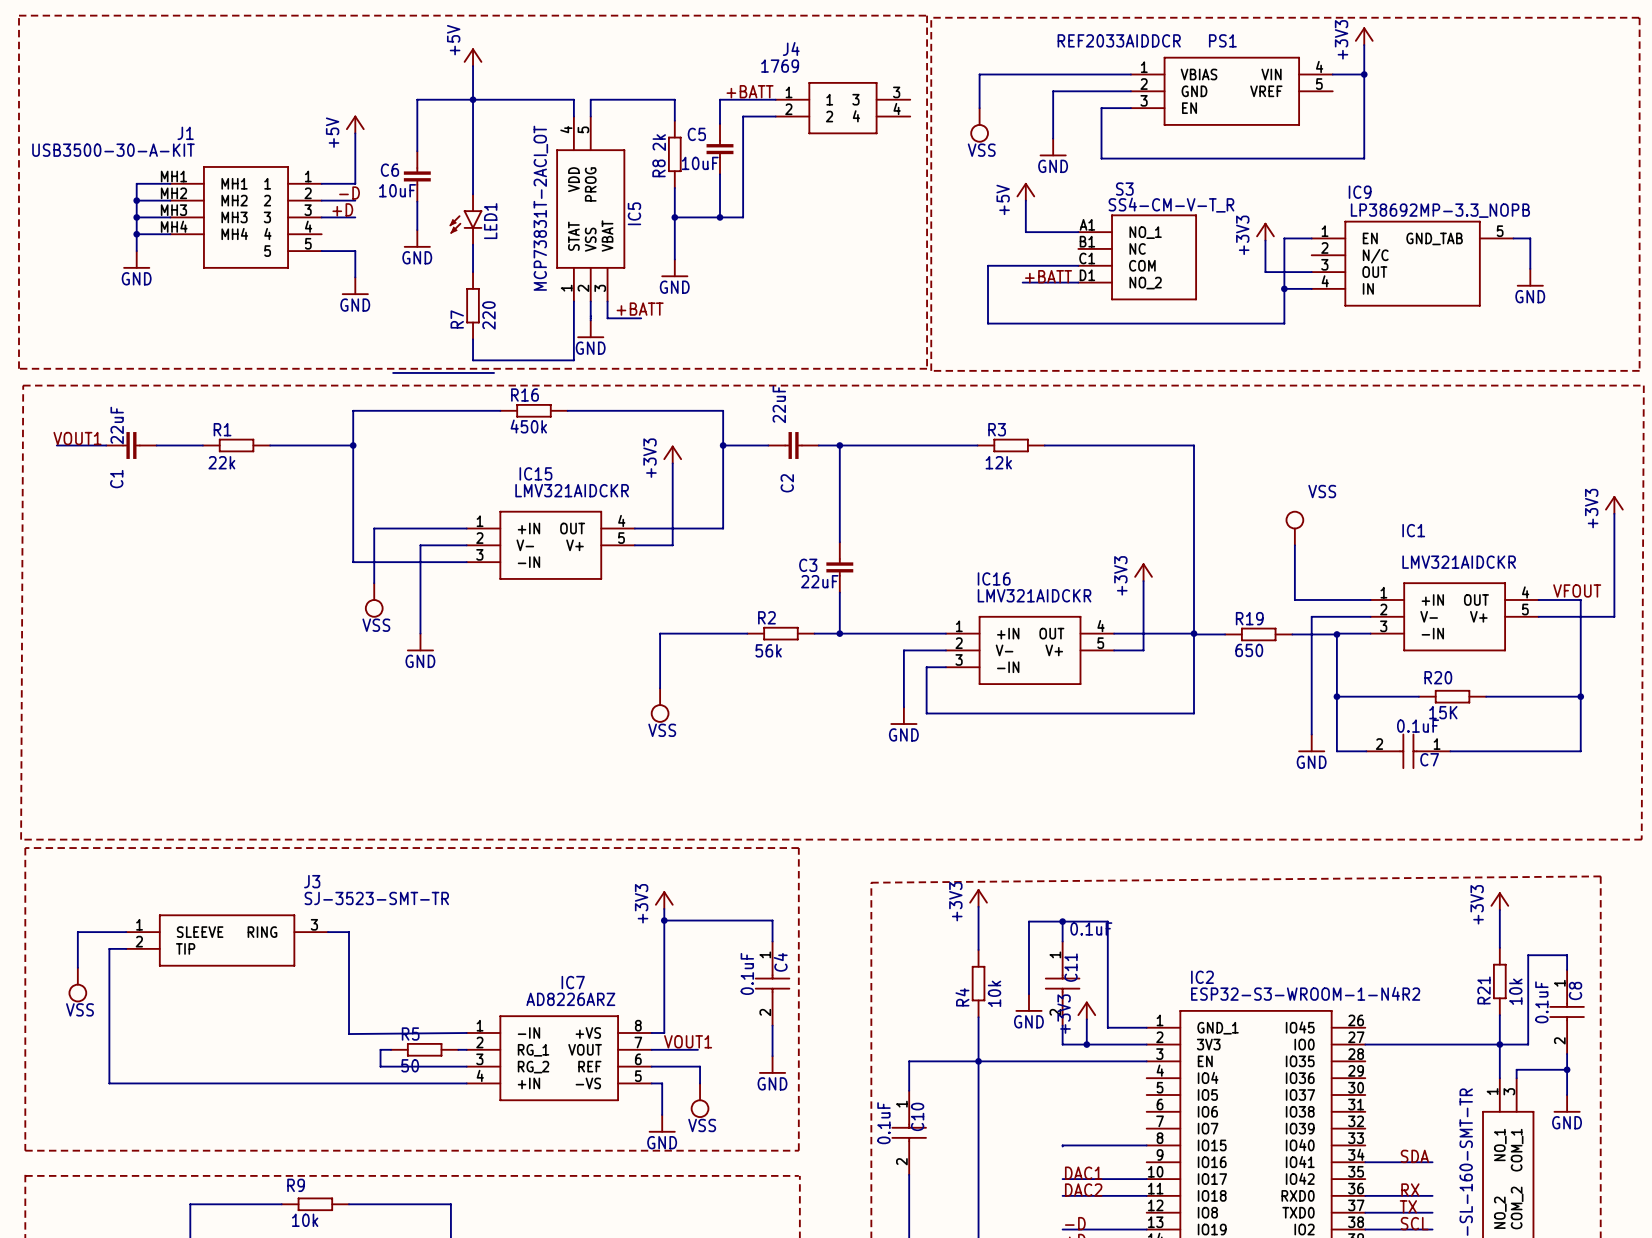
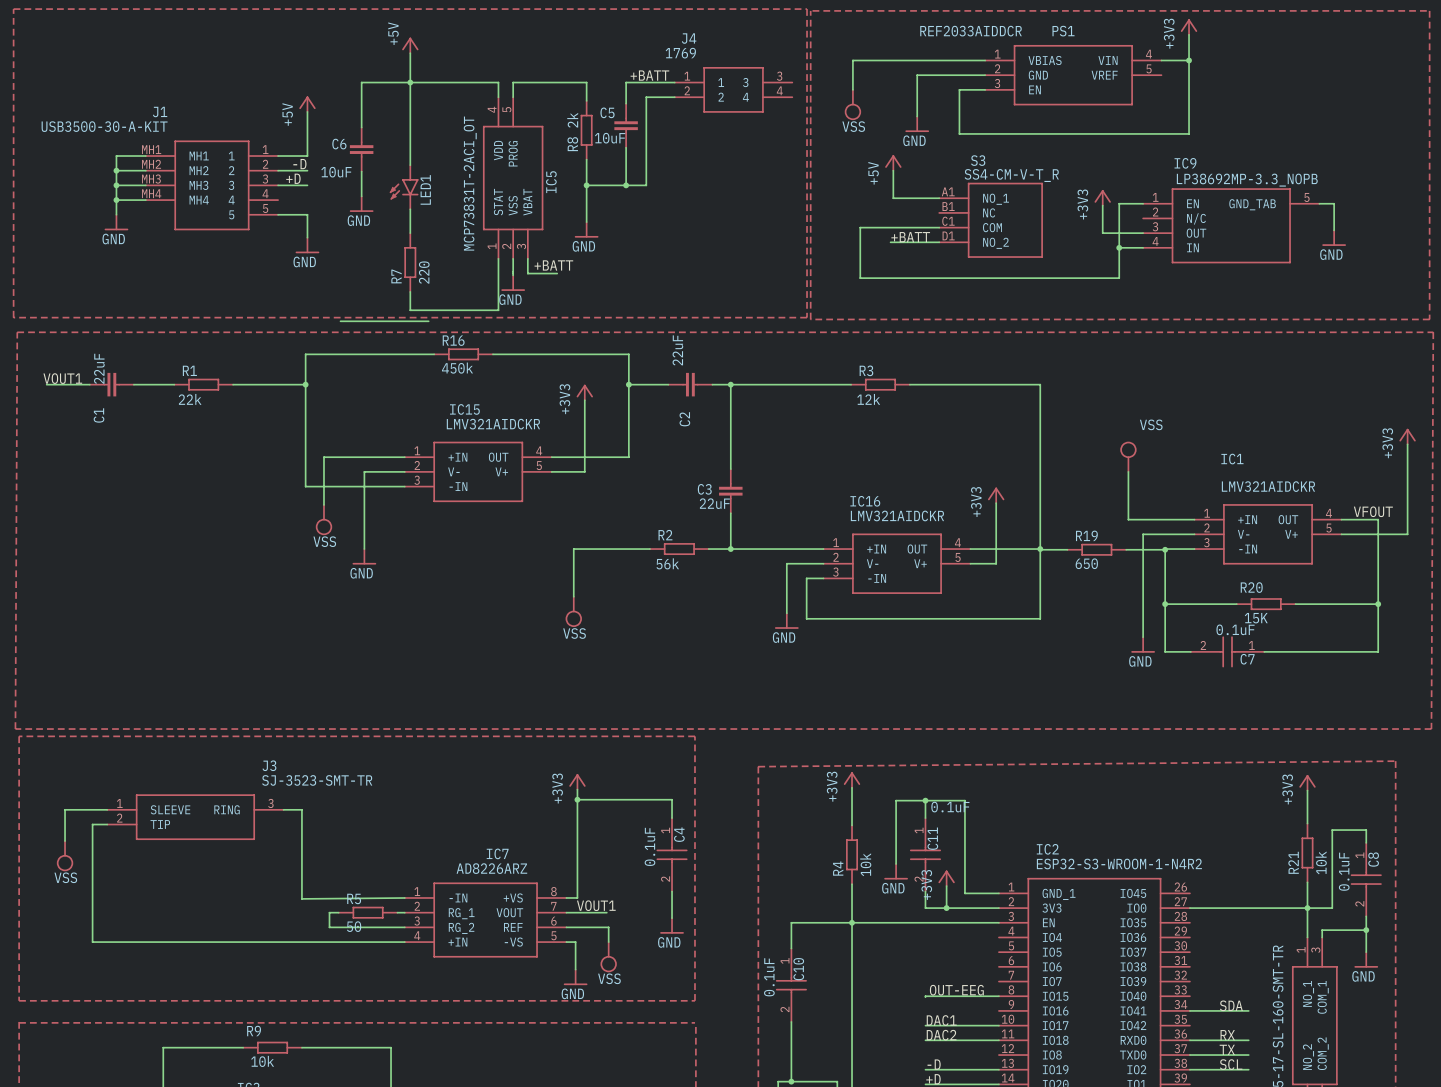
C6 text position: 10uF (397, 190) -> 10uF (336, 172)
label: none -> OUT-EEG (956, 990)

